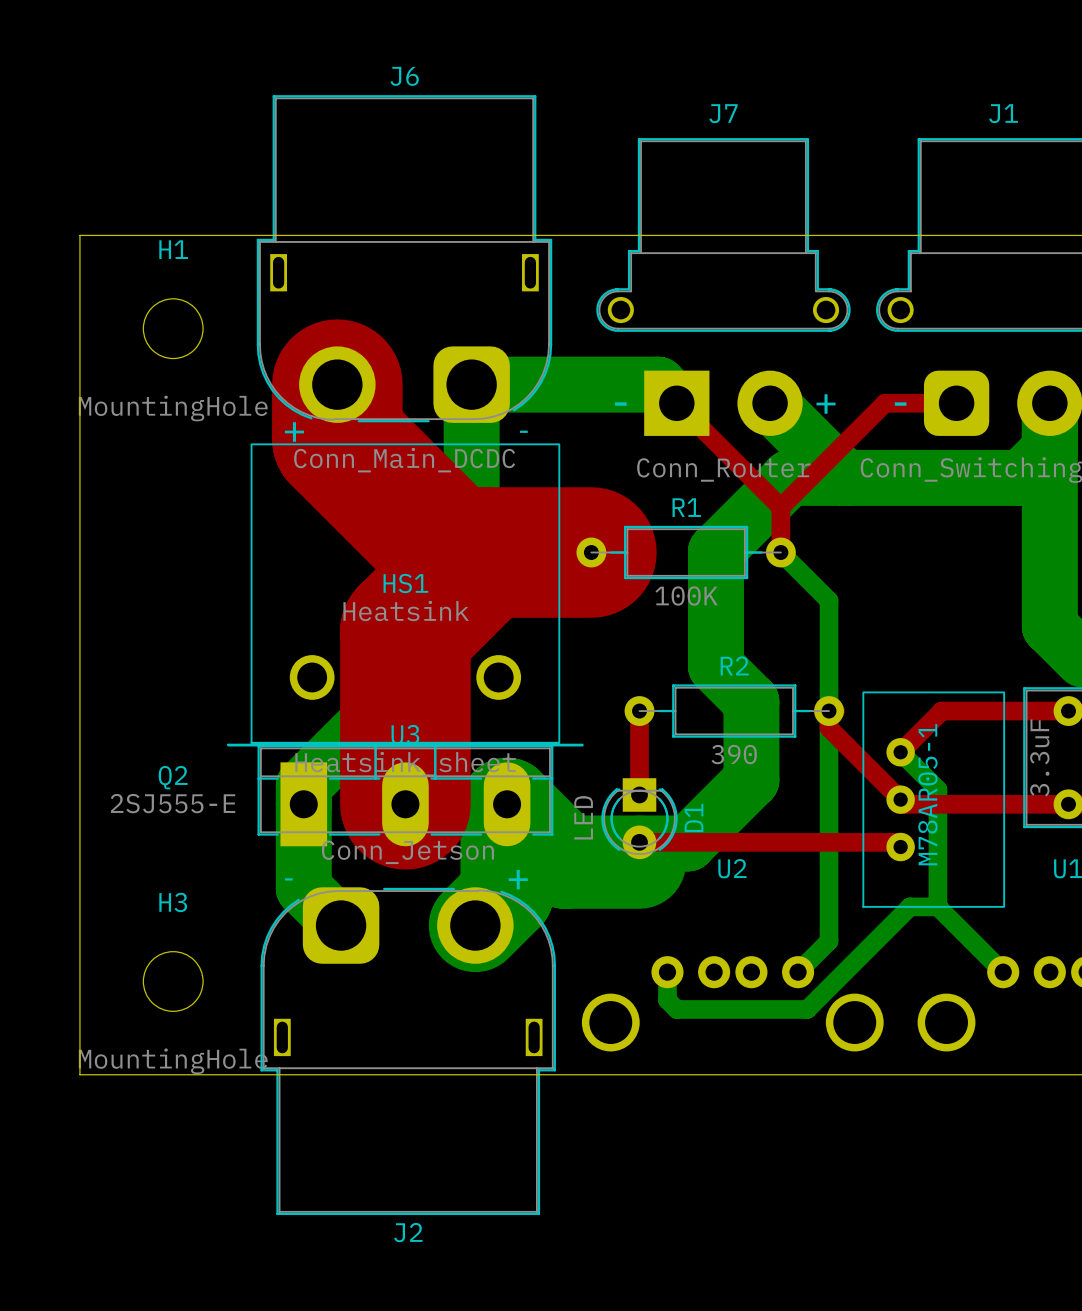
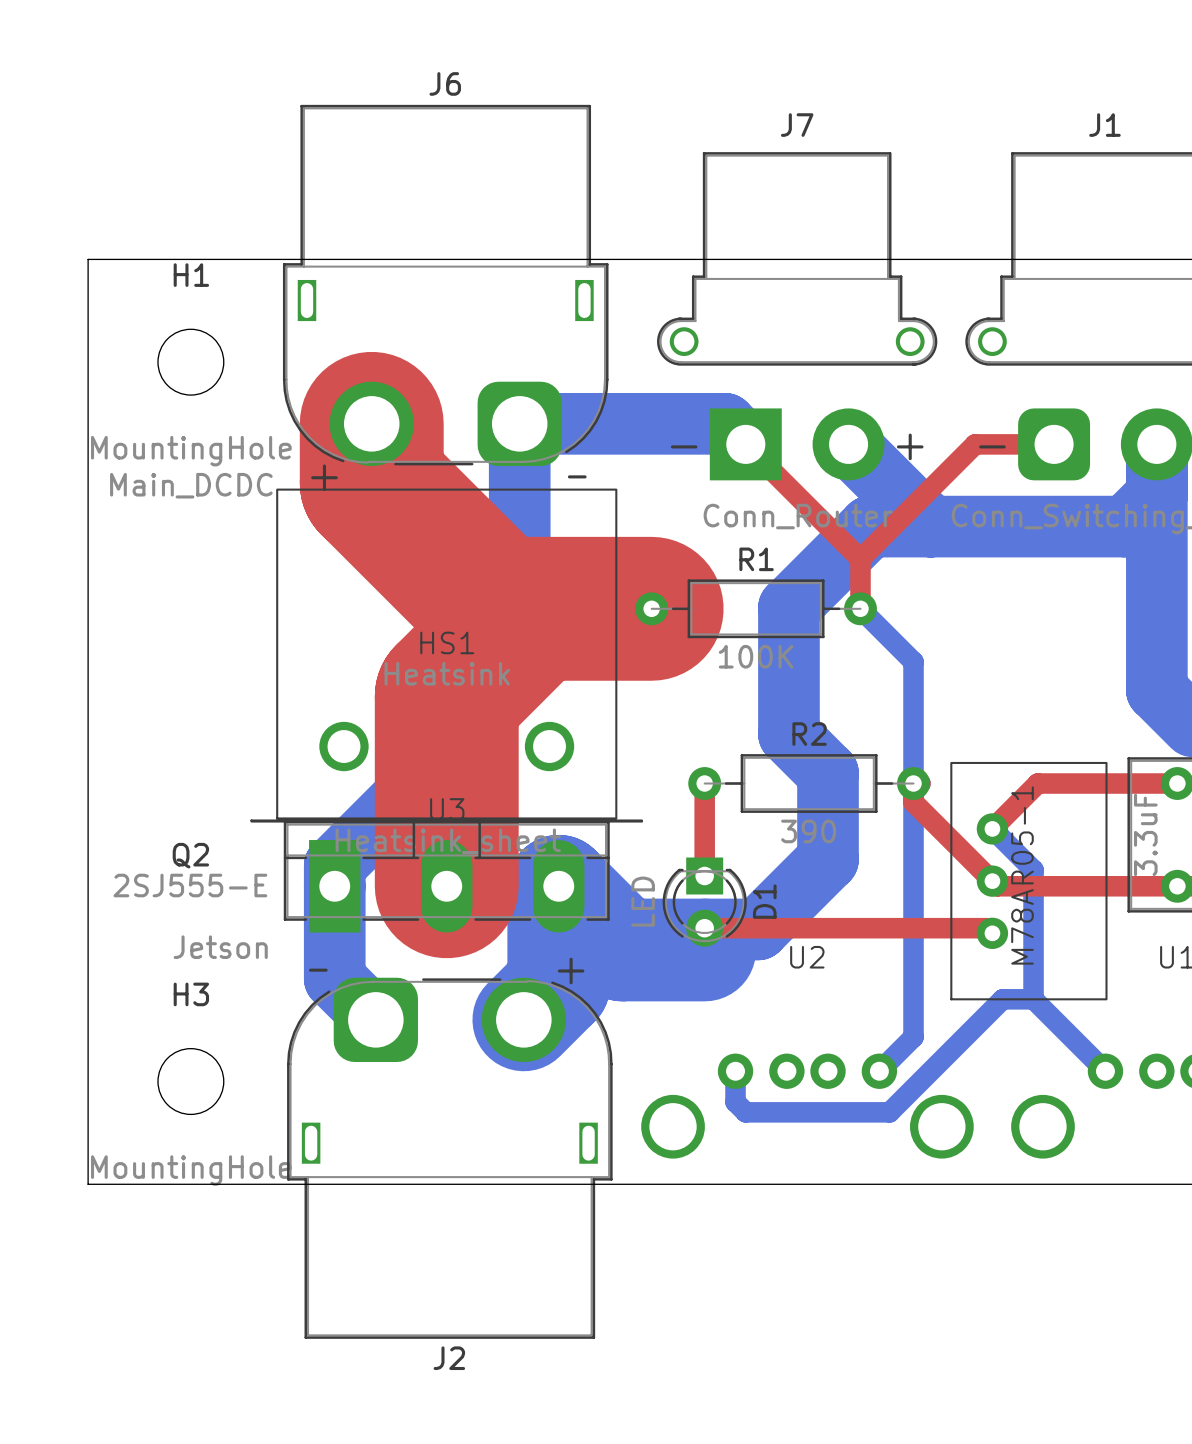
J6 value: Conn_Main_DCDC (404, 460) -> Main_DCDC (191, 485)
J2 value: Conn_Jetson (407, 852) -> Jetson (220, 947)

